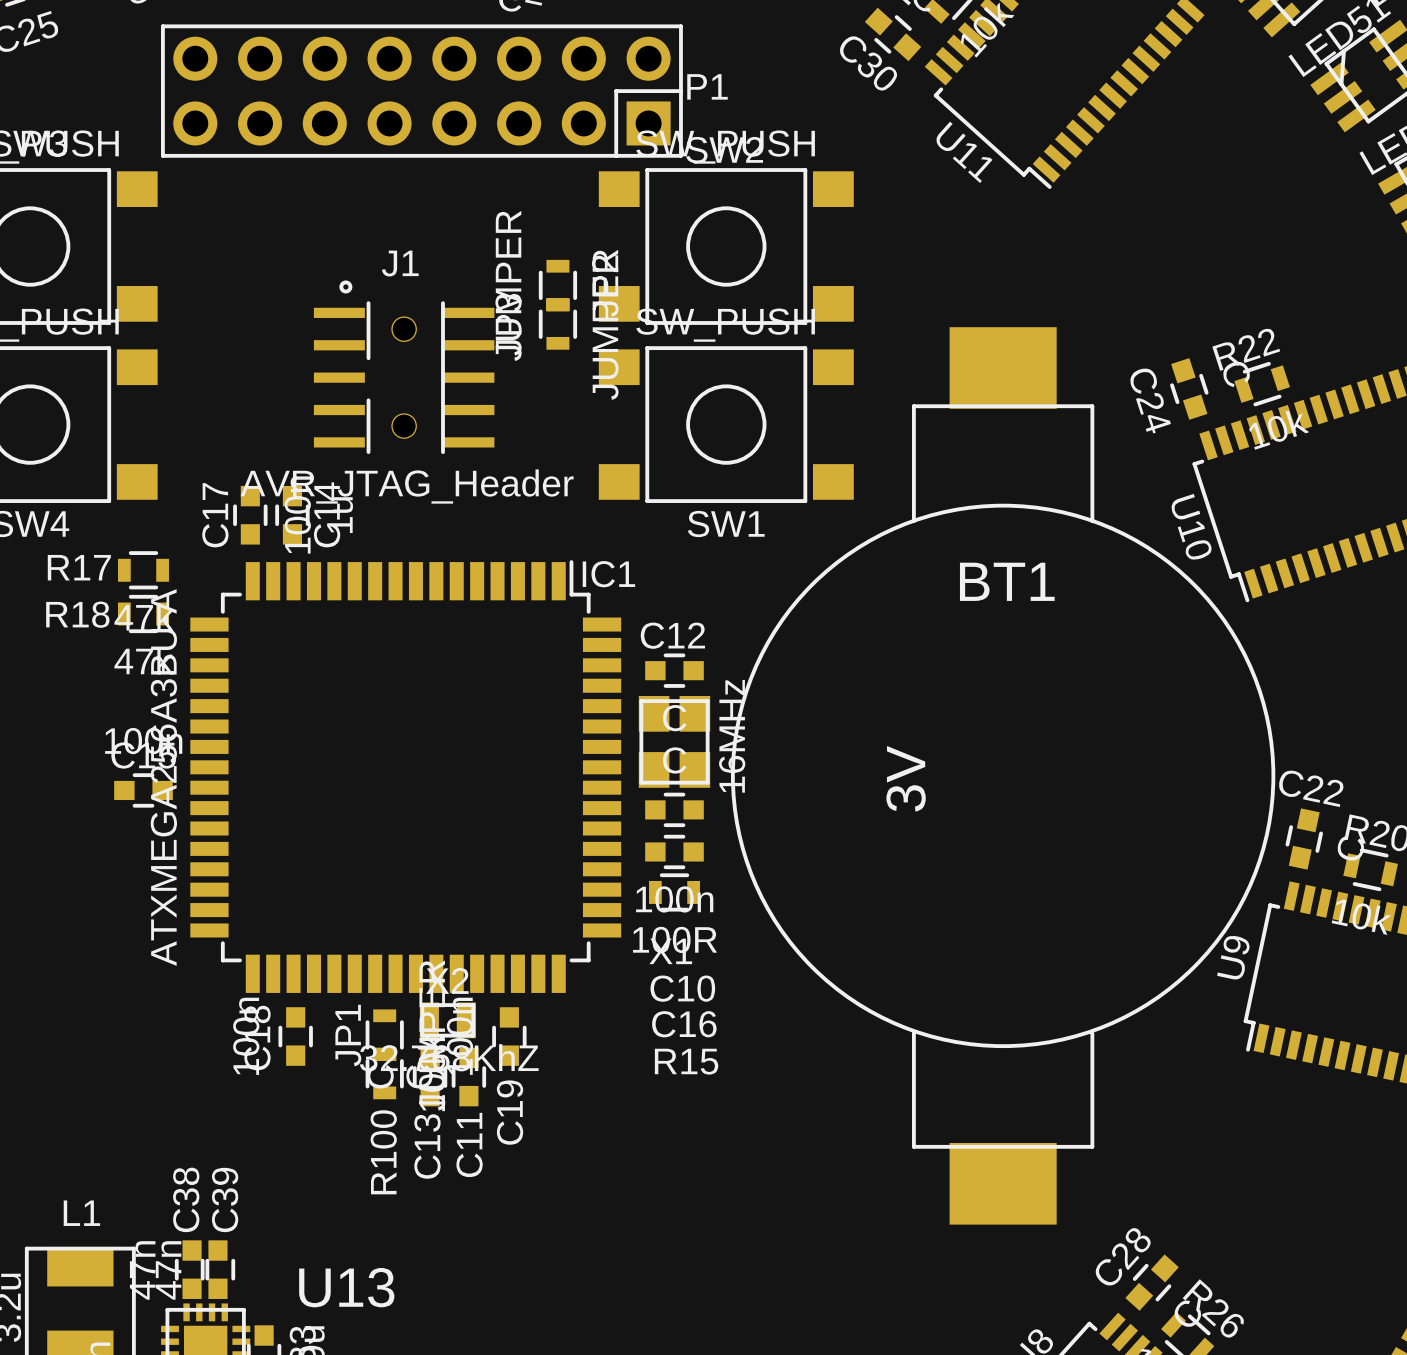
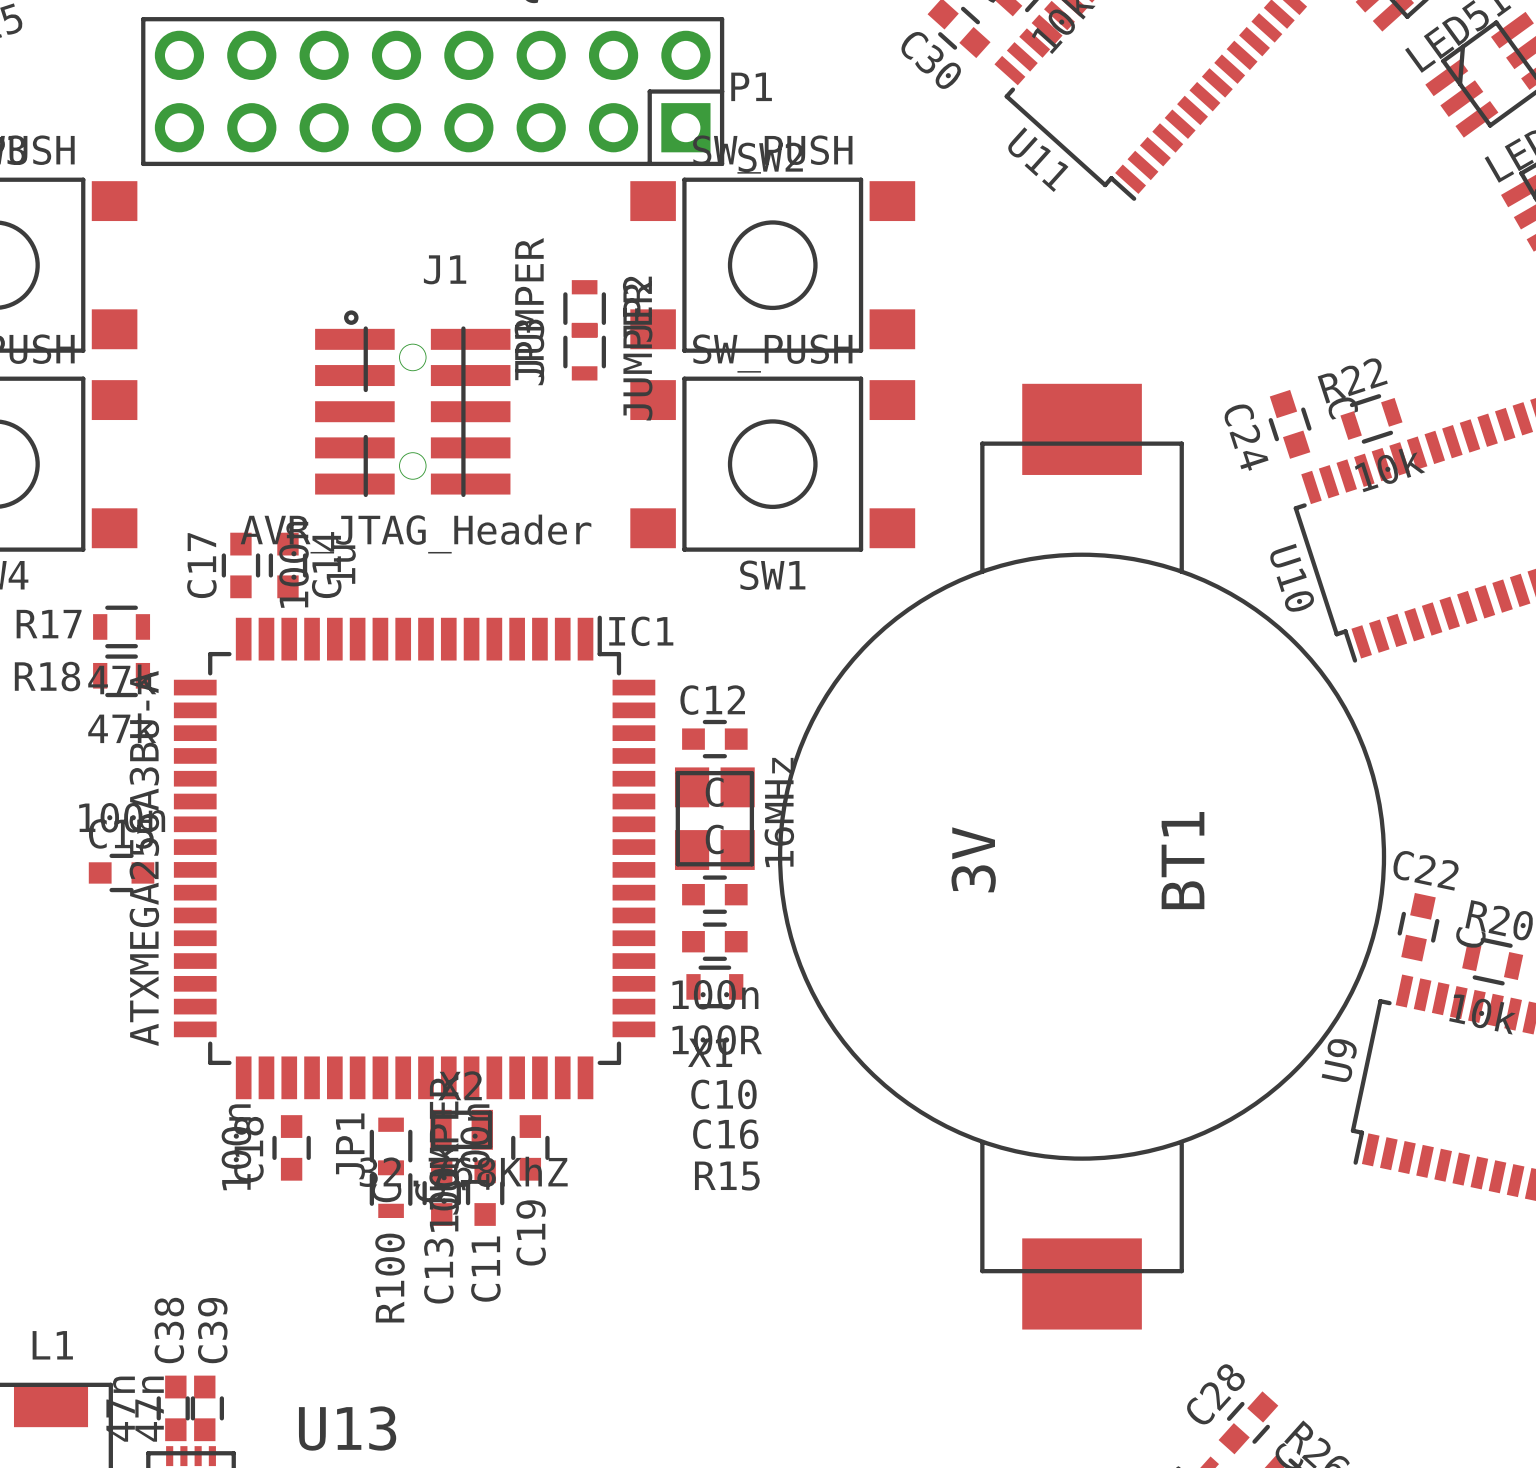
J1 name position: J1 (400, 263) -> J1 (445, 269)
J1 footprint: [313, 280, 495, 455] -> [315, 310, 511, 498]
BT1 footprint: [730, 327, 1276, 1225] -> [777, 383, 1387, 1330]
BT1 name rotation: 0° (1007, 581) -> 90° counterclockwise (1183, 860)
BT1 name position: BT1 (1007, 581) -> BT1 (1183, 860)

